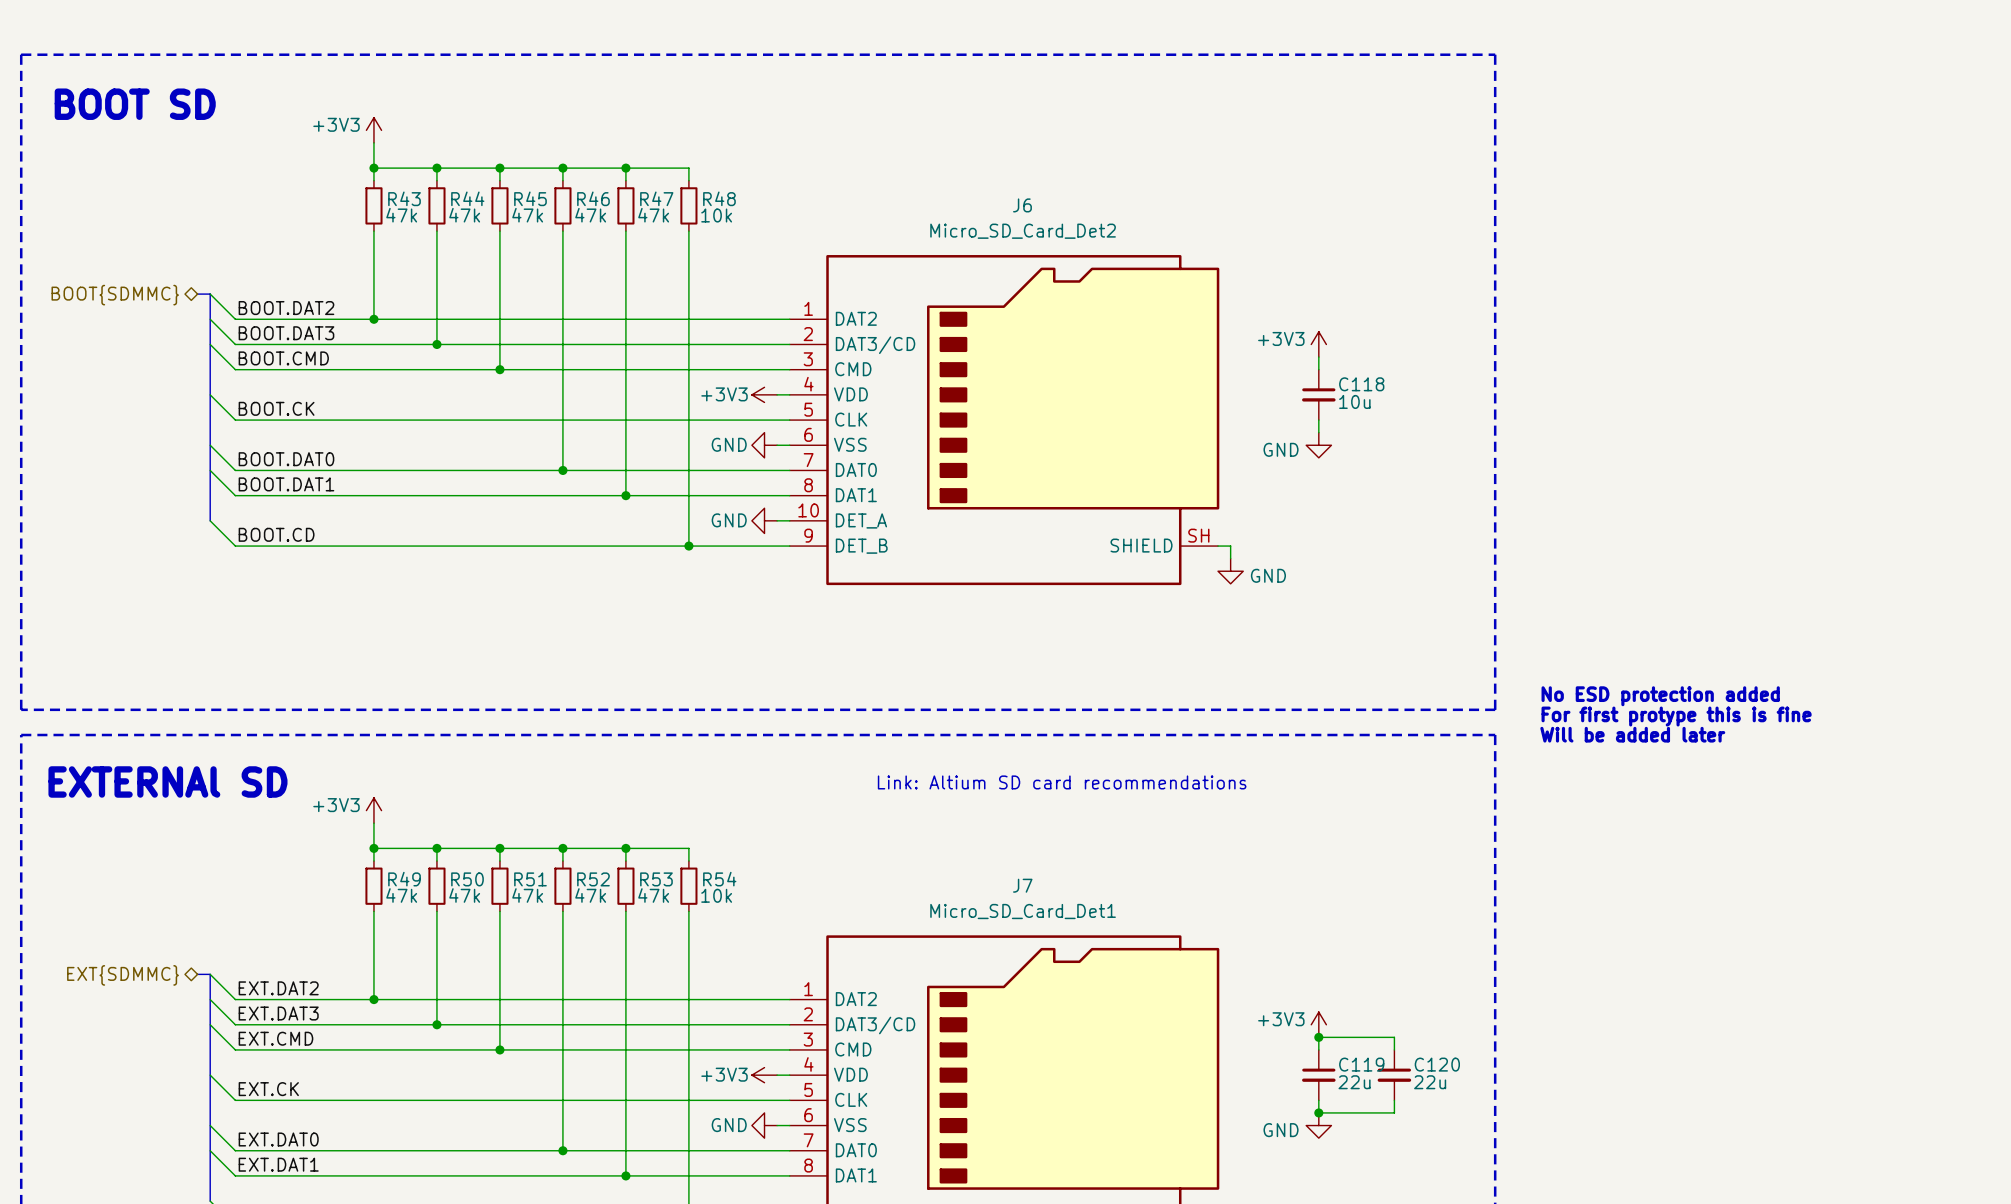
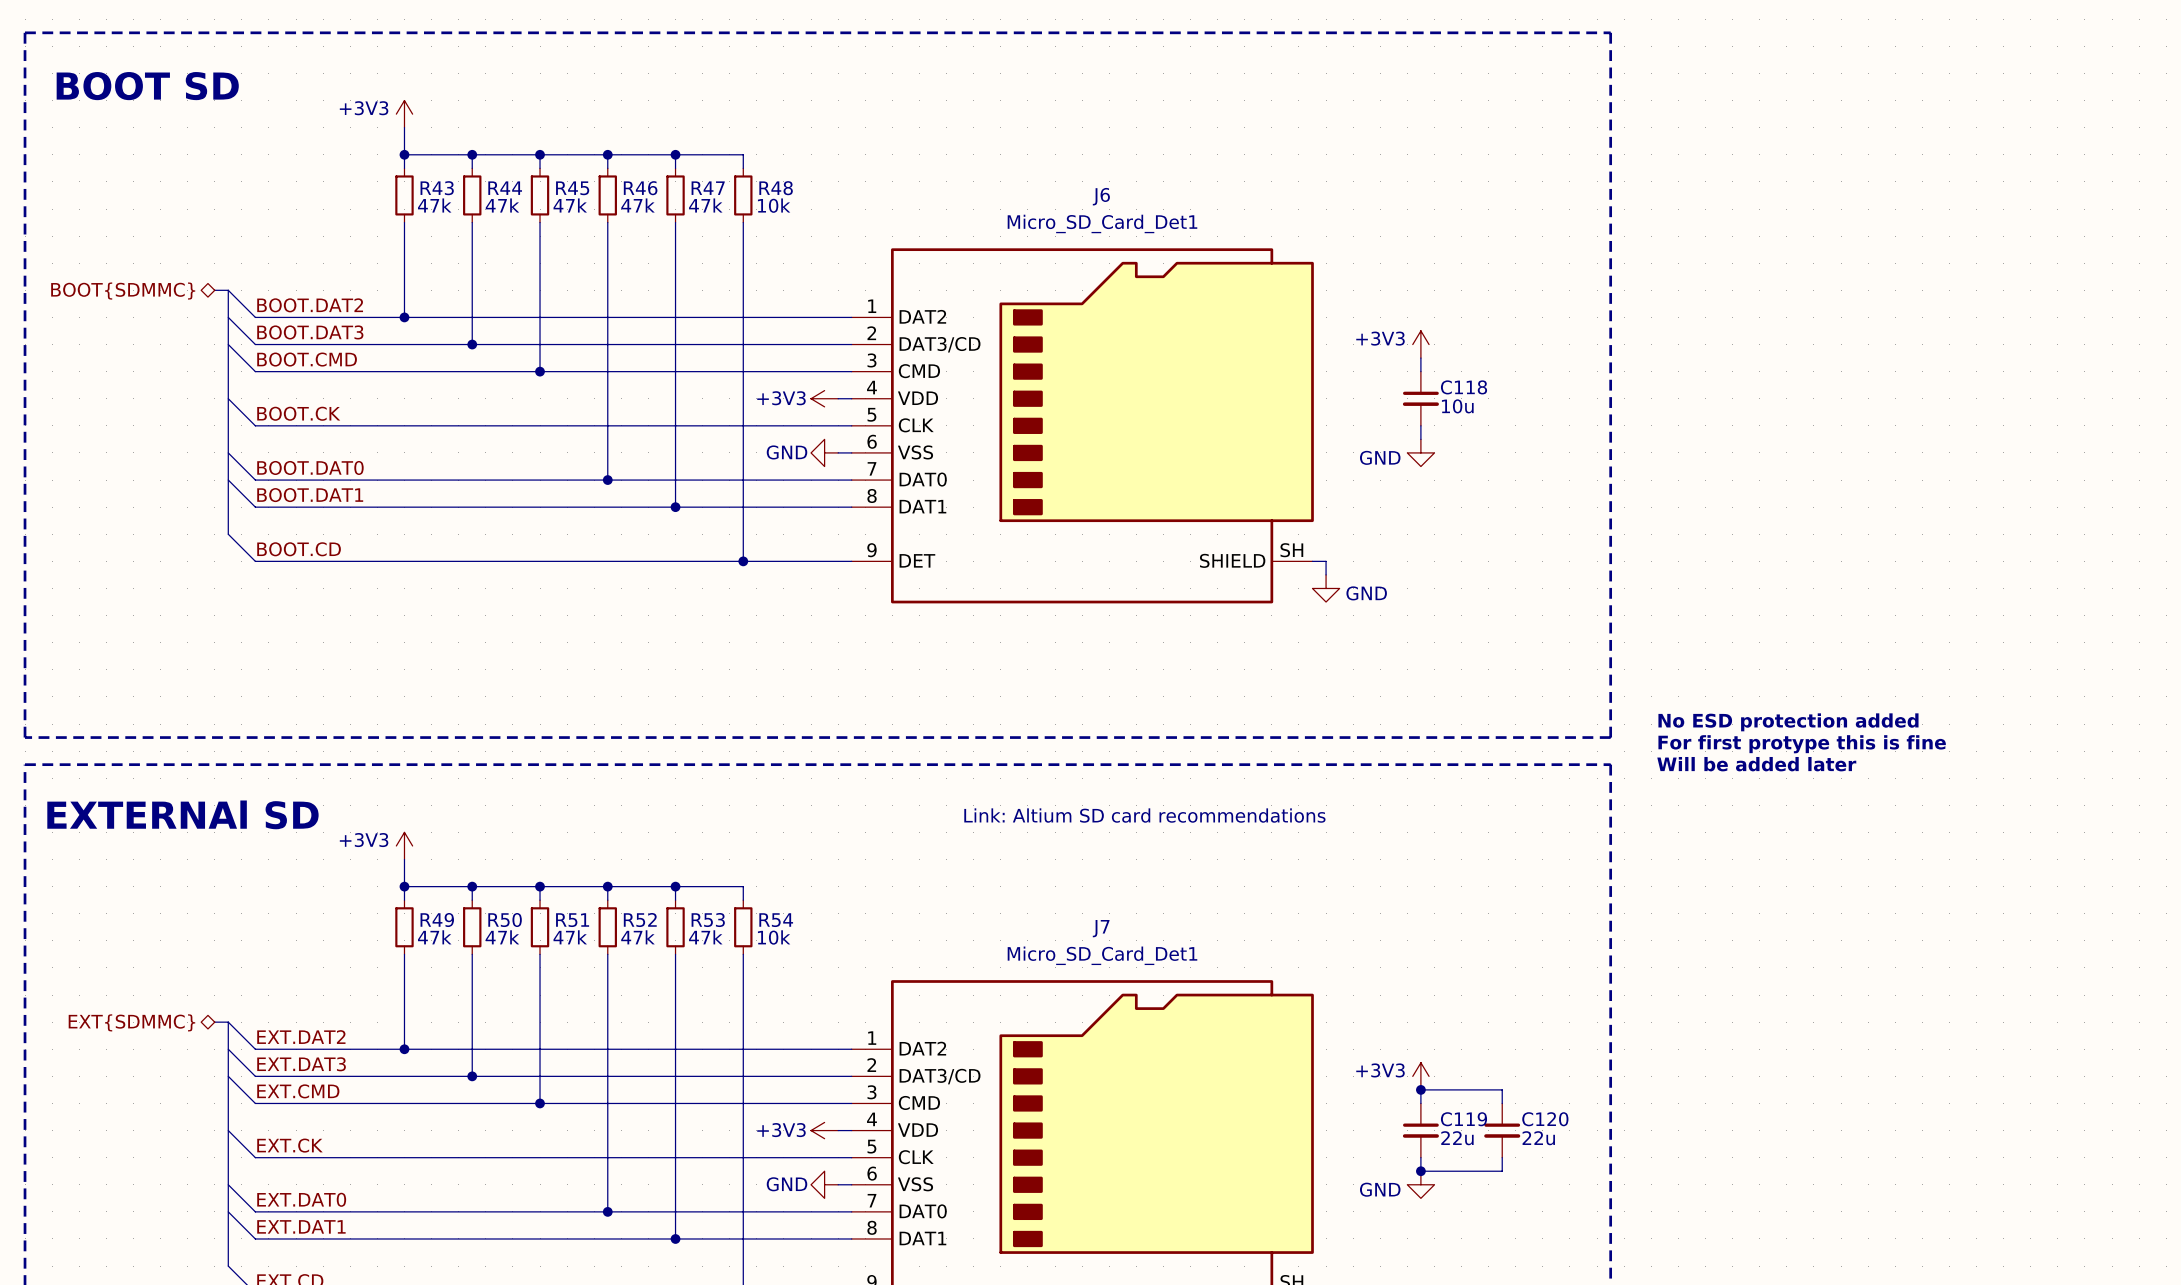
J6 value: Micro_SD_Card_Det2 (1023, 231) -> Micro_SD_Card_Det1 (1102, 223)
J6 symbol: [789, 255, 1220, 586] -> [851, 248, 1314, 604]
power symbol: GND (764, 520) -> none
wire: (777, 520) (789, 520) -> none

